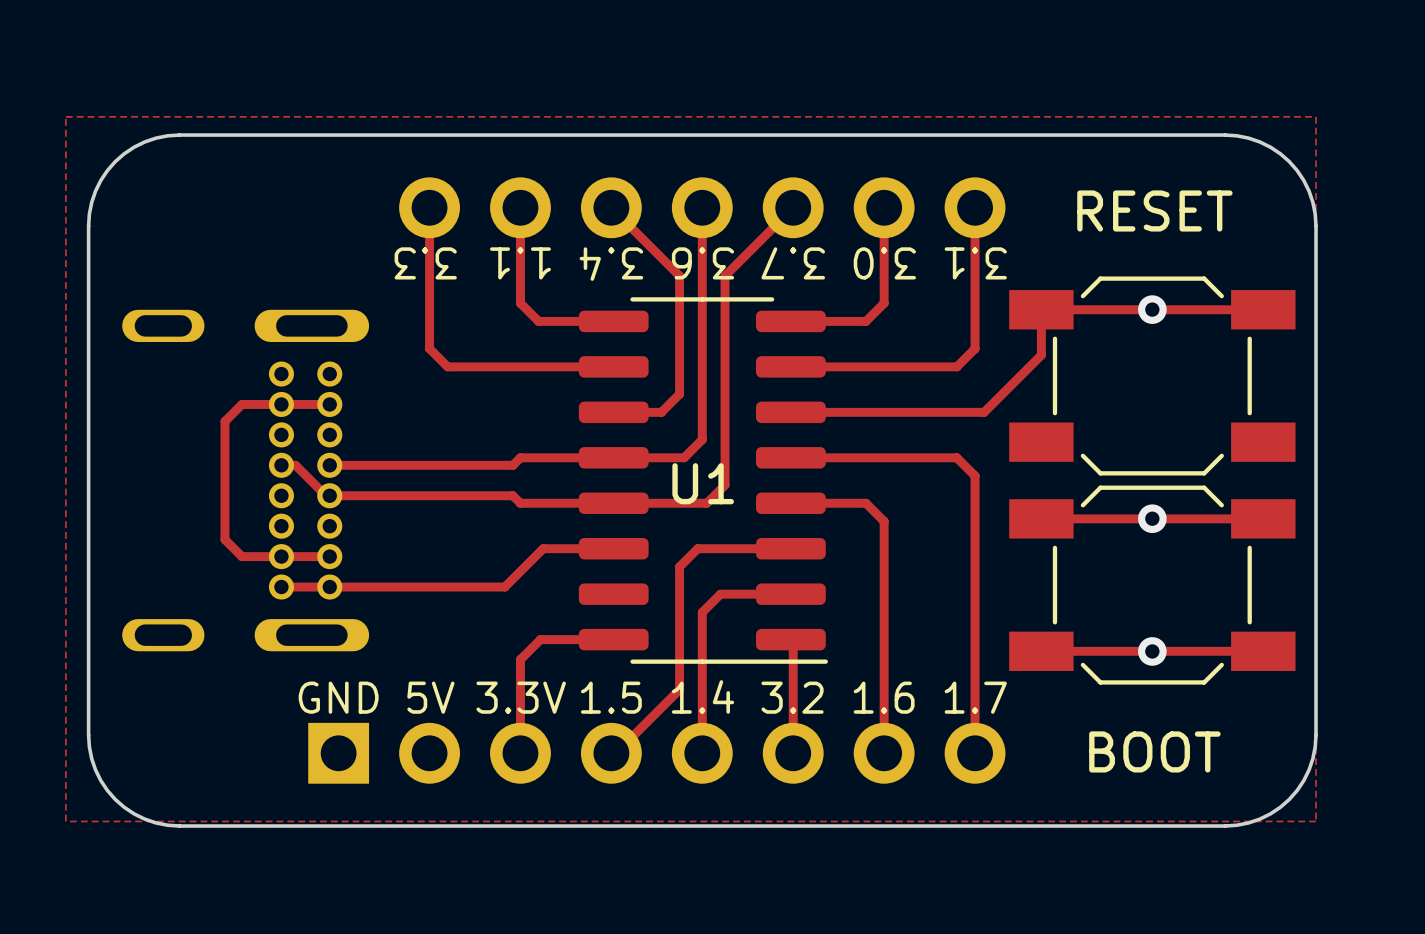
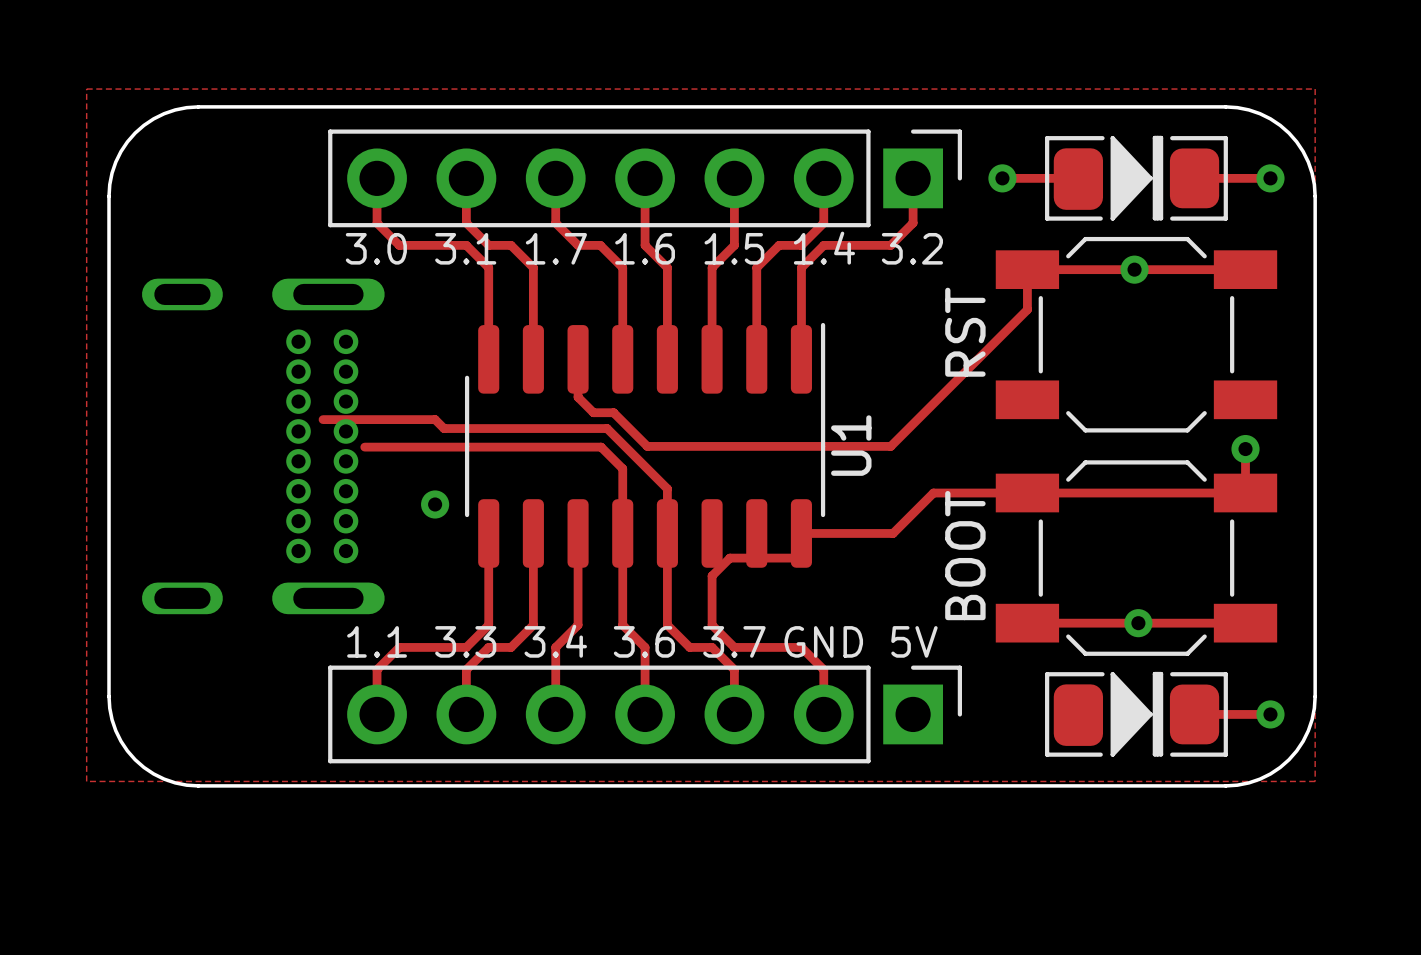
track: none -> (377, 178) (377, 223) (399, 245) (466, 245) (488, 267) (488, 359)
track: (429, 207) (429, 348) (447, 366) (613, 366) -> none
track: (520, 207) (520, 298) -> (466, 178) (466, 223) (488, 245) (511, 245) (533, 267)
track: none -> (555, 178) (555, 223) (578, 245) (600, 245) (622, 267) (622, 359)
track: (611, 207) (679, 275) (679, 394) (661, 412) (613, 412) -> none
track: none -> (645, 178) (645, 245) (667, 267) (667, 359)
part: none -> (645, 178)
track: (702, 207) (702, 298) -> (734, 178) (734, 245) (712, 267)
part: (702, 207) -> none
track: (793, 207) (725, 275) (725, 485) (706, 503) (520, 503) (512, 495) (326, 495) (295, 465) (281, 465) -> none
track: none -> (823, 178) (823, 223) (801, 245) (779, 245) (756, 267) (756, 359)
track: (884, 207) (884, 303) (865, 321) (790, 321) -> none
track: none -> (913, 178) (913, 223) (890, 245) (823, 245) (801, 267) (801, 359)
track: (975, 207) (975, 348) (956, 366) (790, 366) -> none
track: none -> (1002, 178) (1077, 178)
via: none -> (1002, 178)
part: none -> (1136, 178)
track: none -> (1194, 178) (1270, 178)
via: none -> (1270, 178)
part value: RESET (1154, 210) -> RST (965, 332)
text rotation: 0° (425, 263) -> 180° (465, 641)
text position: 3.3 (425, 263) -> 3.3 (465, 641)
text rotation: 0° (520, 263) -> 180° (377, 641)
text position: 1.1 (520, 263) -> 1.1 (377, 641)
text rotation: 0° (702, 263) -> 180° (644, 641)
text position: 3.6 (702, 263) -> 3.6 (644, 641)
text rotation: 0° (793, 263) -> 180° (734, 641)
text position: 3.7 (793, 263) -> 3.7 (734, 641)
text rotation: 0° (884, 263) -> 180° (376, 248)
text position: 3.0 (884, 263) -> 3.0 (376, 248)
text rotation: 0° (975, 263) -> 180° (465, 248)
text position: 3.1 (975, 263) -> 3.1 (465, 248)
text rotation: 0° (611, 264) -> 180° (555, 641)
text position: 3.4 (611, 264) -> 3.4 (555, 641)
track: none -> (1245, 269) (1027, 269) (1027, 309) (890, 446) (647, 446) (613, 412) (593, 412) (578, 397) (578, 359)
track: (520, 303) (538, 321) (613, 321) -> (533, 272) (533, 359)
track: (1150, 309) (1041, 309) (1041, 355) (984, 412) (790, 412) -> none
via position: (1152, 309) -> (1134, 269)
track: (1154, 309) (1263, 309) -> none
part position: (1152, 375) -> (1136, 334)
track: (702, 391) (702, 439) (684, 457) (520, 457) (512, 465) (329, 465) -> none
track: (329, 404) (241, 404) (224, 421) (224, 539) (241, 556) (329, 556) -> none
track: none -> (323, 419) (435, 419) (444, 428) (607, 428) (667, 488) (667, 625) (689, 647) (712, 647) (734, 669) (734, 714)
track: (790, 457) (956, 457) (975, 475) (975, 753) -> none
U1 rotation: 0° (703, 480) -> 90° counterclockwise (645, 445)
track: none -> (364, 447) (601, 447) (622, 468) (622, 625) (645, 647) (645, 714)
U1 name position: U1 (703, 483) -> U1 (851, 445)
track: none -> (1245, 449) (1245, 493) (933, 493) (893, 533) (801, 533)
via: none -> (1245, 449)
track: (790, 503) (865, 503) (884, 521) (884, 753) -> none
track: (1041, 518) (1150, 518) -> none
via: (1152, 518) -> none
track: (1154, 518) (1263, 518) -> none
via: none -> (435, 504)
track: (613, 548) (543, 548) (504, 587) (281, 587) -> none
track: (790, 548) (697, 548) (679, 566) (679, 689) (615, 753) (611, 753) -> none
track: none -> (488, 533) (488, 625) (466, 647) (399, 647) (377, 669) (377, 714)
track: none -> (578, 533) (578, 625) (555, 647) (555, 714)
part position: (1152, 585) -> (1136, 558)
track: (613, 639) (540, 639) (520, 659) -> (533, 533) (533, 622)
track: (790, 639) (793, 641) (793, 753) -> none
track: (1041, 651) (1150, 651) -> none
via position: (1152, 651) -> (1138, 623)
track: (1154, 651) (1263, 651) -> none
track: none -> (1027, 623) (1245, 623)
track: (520, 662) (520, 753) -> (533, 625) (511, 647) (488, 647) (466, 669) (466, 714)
track: (702, 662) (702, 753) -> (712, 625) (734, 647) (801, 647) (823, 669) (823, 714)
text position: 1.4 (702, 696) -> 1.4 (824, 248)
text position: GND (338, 697) -> GND (823, 641)
text position: 5V (430, 697) -> 5V (914, 641)
text: 3.3V (521, 697) -> none
text position: 1.5 (611, 697) -> 1.5 (734, 248)
text position: 3.2 (792, 697) -> 3.2 (912, 248)
text position: 1.6 (884, 697) -> 1.6 (645, 248)
text position: 1.7 (975, 697) -> 1.7 (556, 248)
part footprint: [308, 722, 1006, 784] -> [328, 665, 963, 764]
part value rotation: 0° (1154, 751) -> 90° counterclockwise (965, 555)
part value position: BOOT (1154, 751) -> BOOT (965, 555)
part: none -> (1136, 714)
track: none -> (1194, 714) (1270, 714)
via: none -> (1270, 714)

